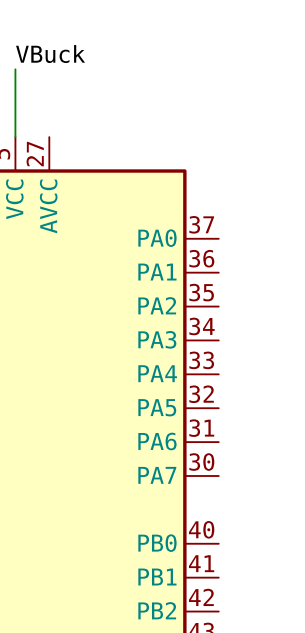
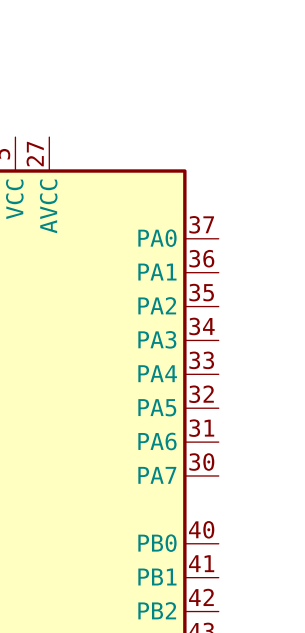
label: VBuck (50, 54) -> none
wire: (15, 69) (15, 137) -> none

